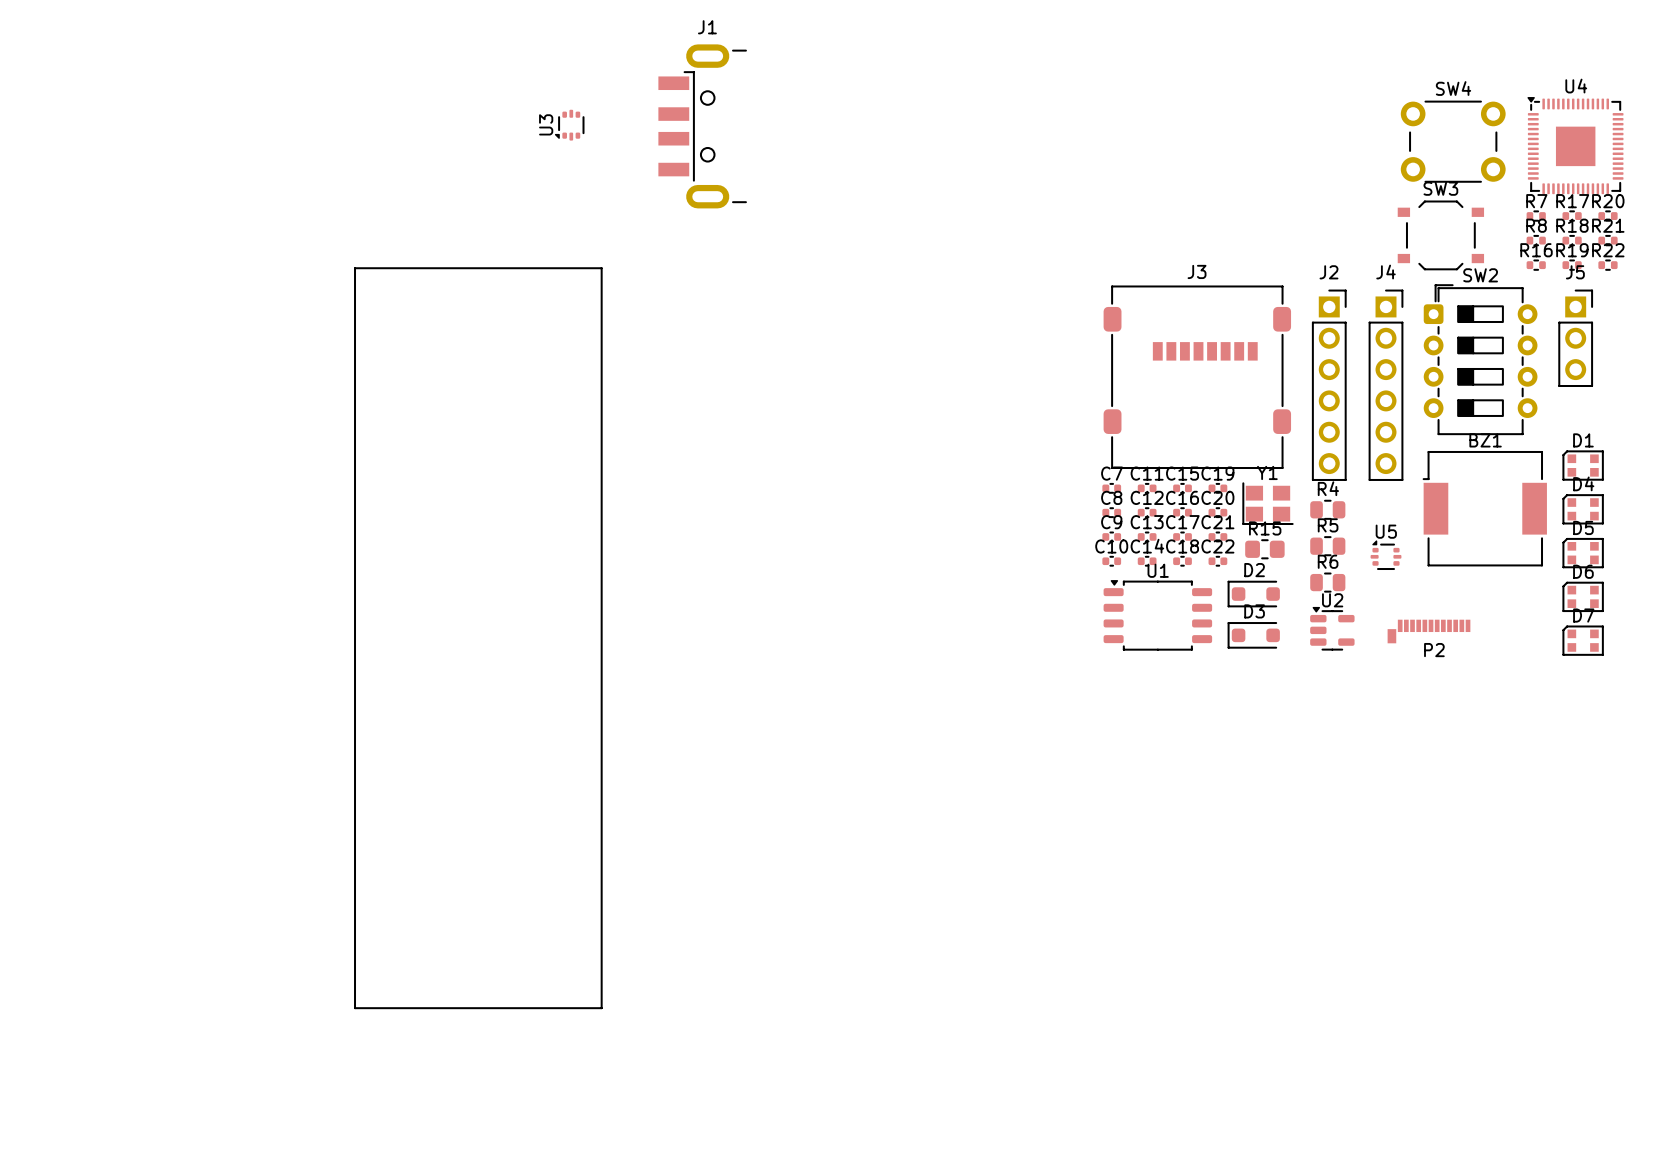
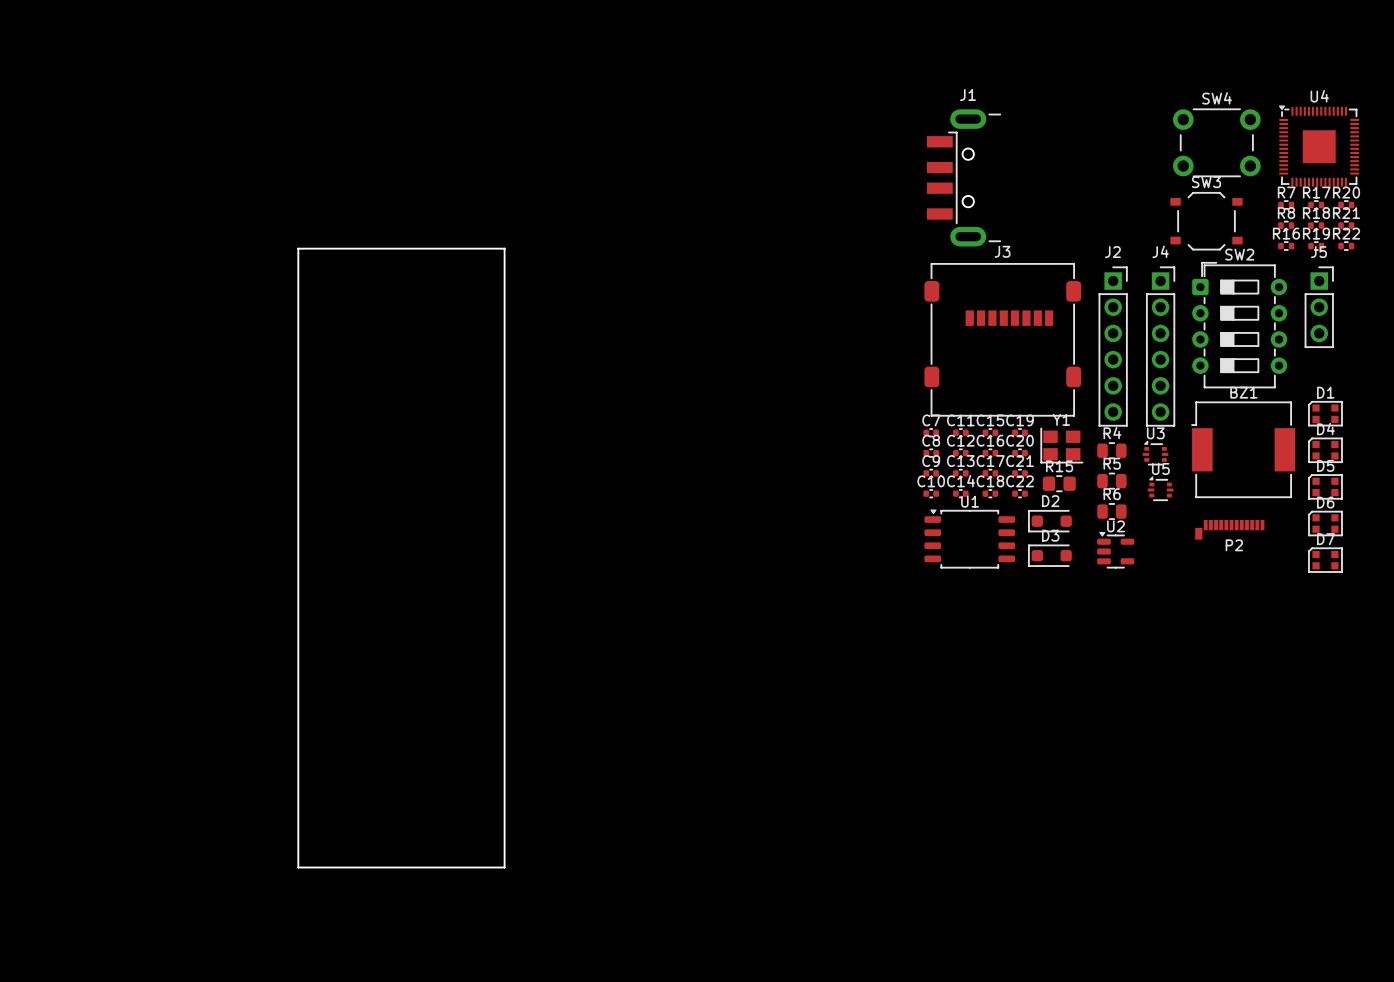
U3 rotation: 0° (569, 125) -> 90° clockwise (1155, 452)
U3 position: (569, 125) -> (1155, 452)
J1 position: (702, 126) -> (963, 177)
P2 position: (1428, 631) -> (1229, 529)

